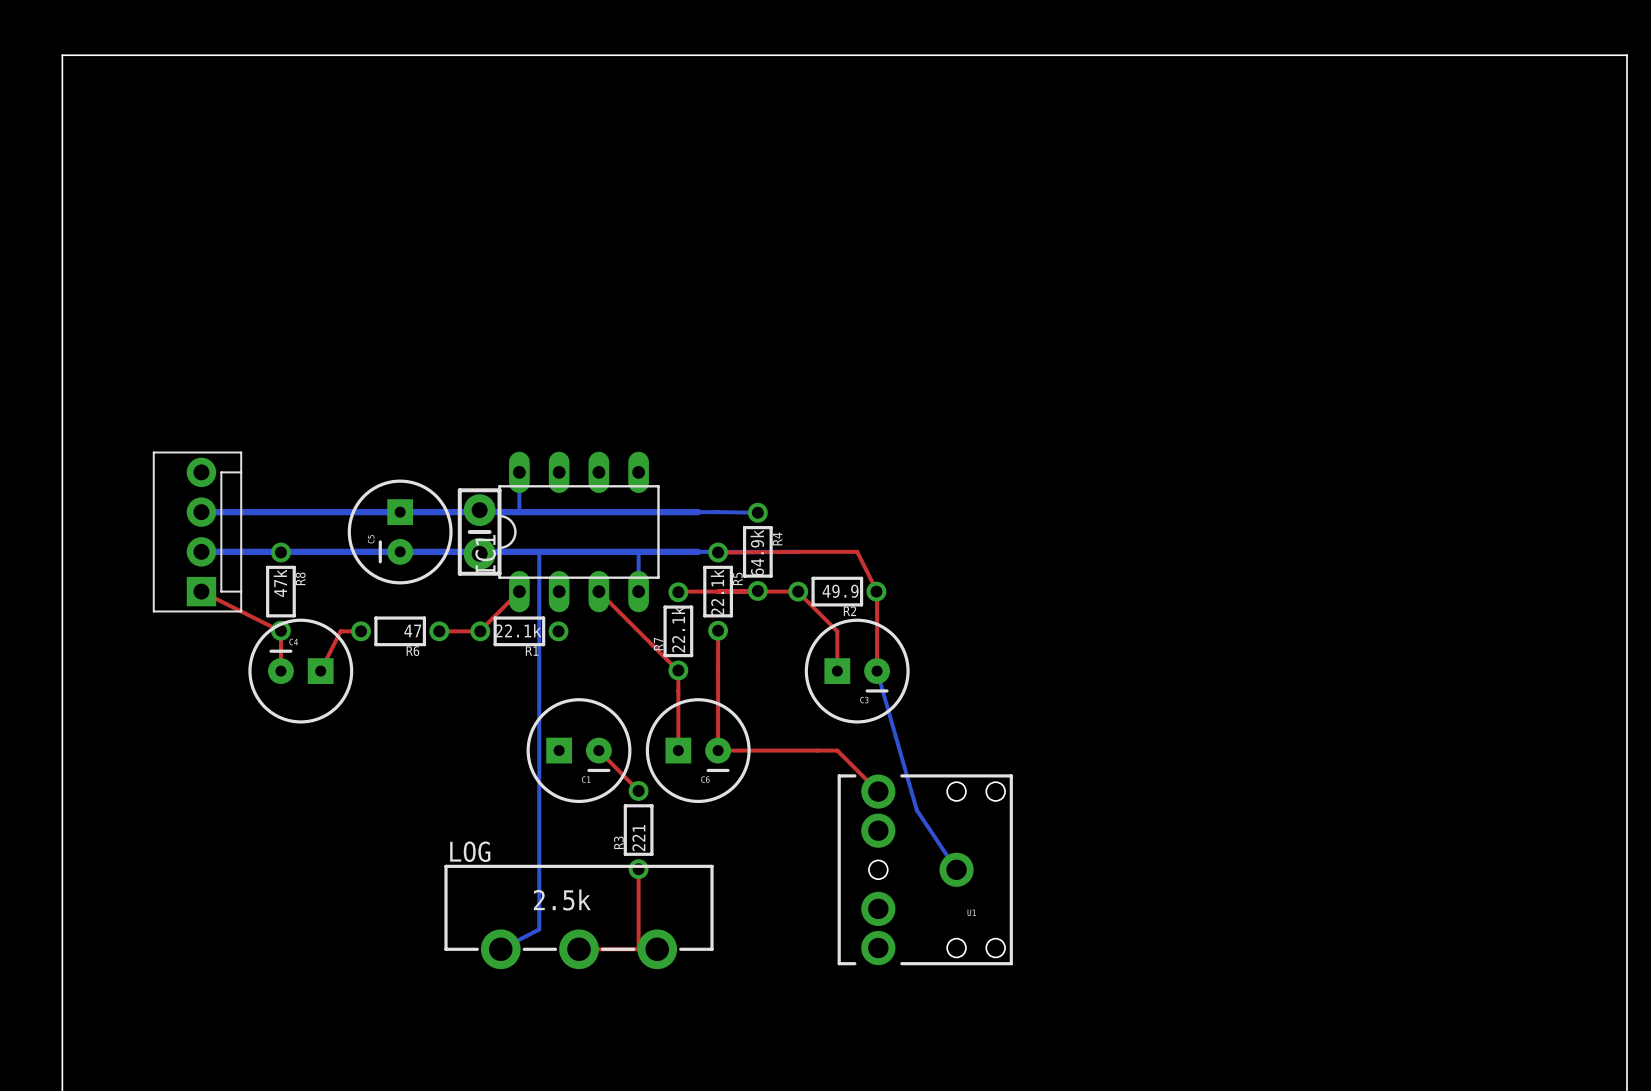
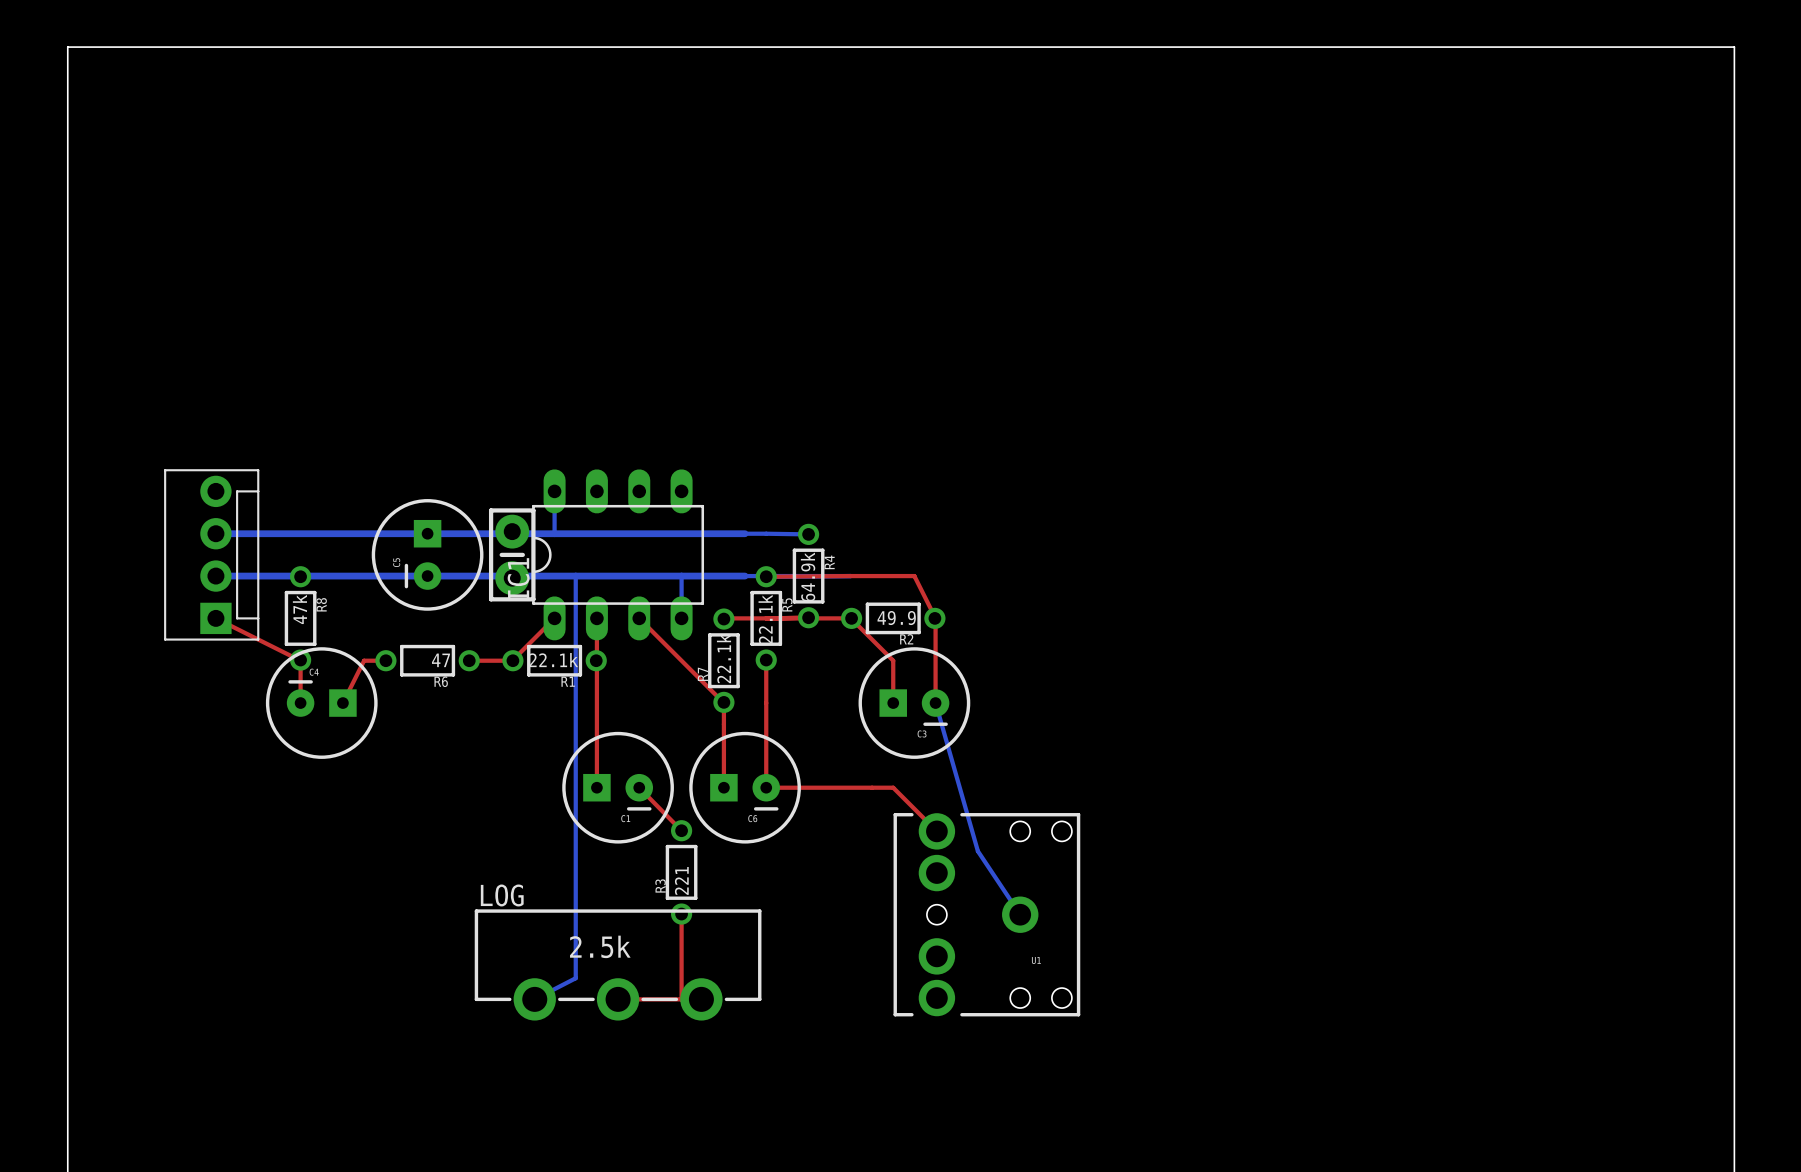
top track: none -> (596, 618) (596, 787)

